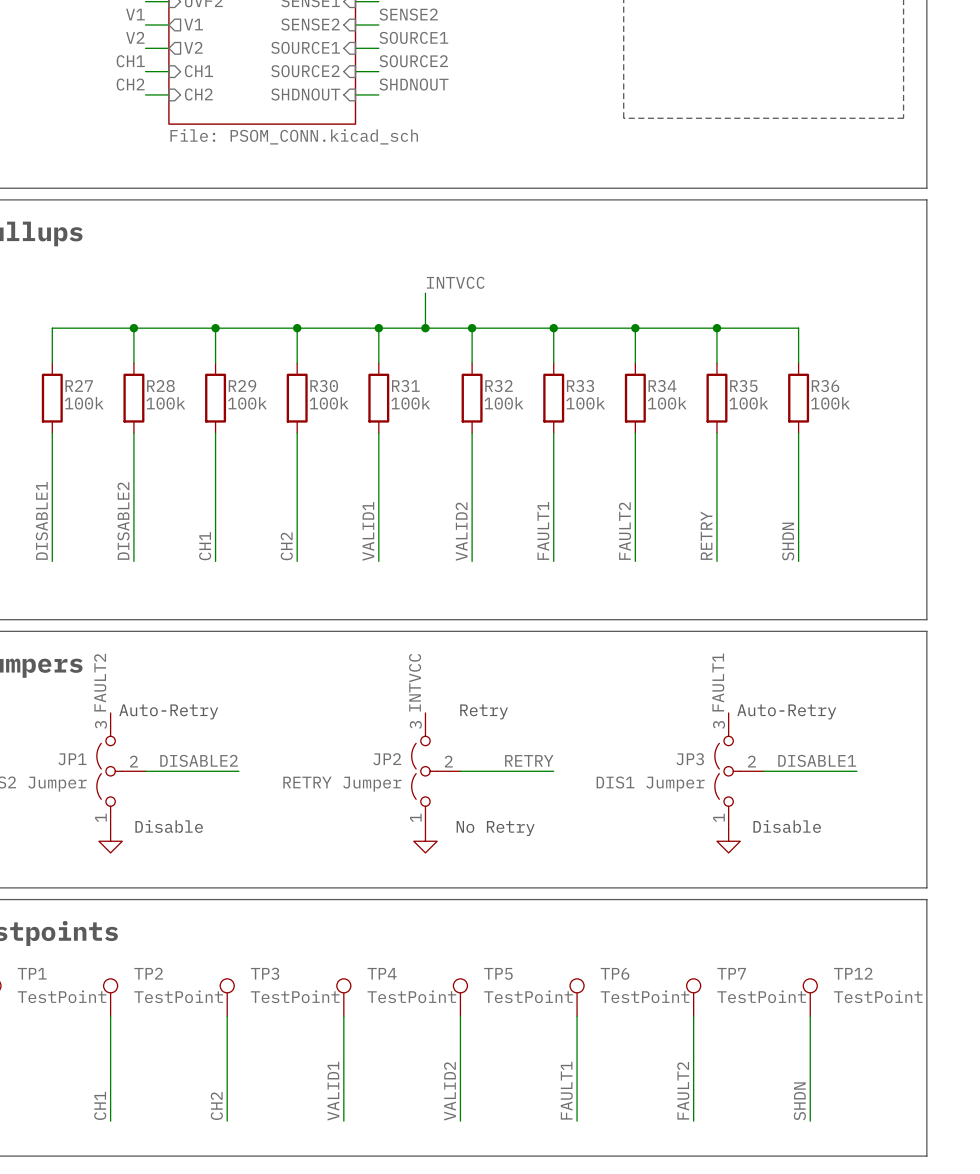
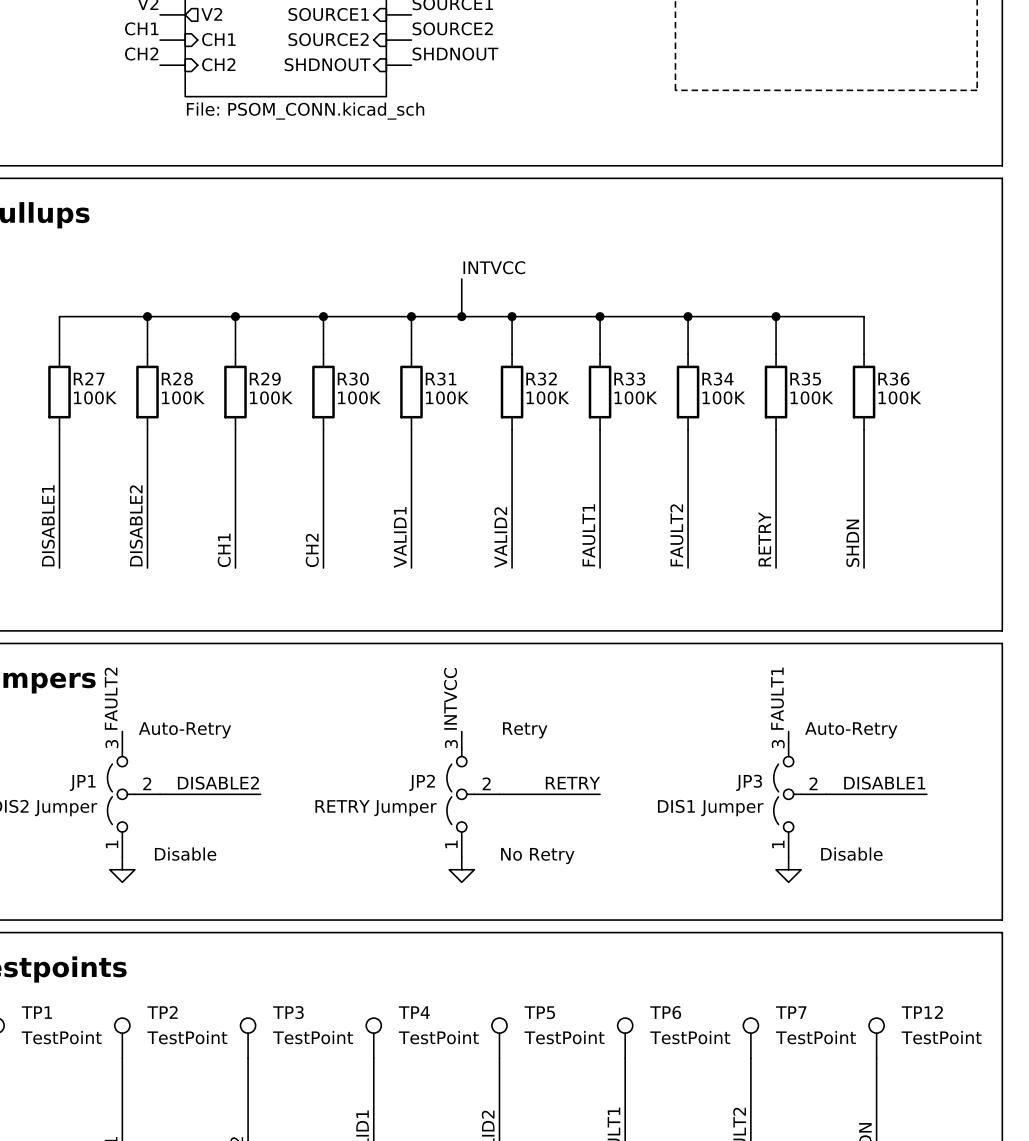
R27 value: 100k (84, 403) -> 100K (95, 397)
R28 value: 100k (165, 403) -> 100K (183, 397)
R29 value: 100k (247, 403) -> 100K (271, 397)
R30 value: 100k (329, 403) -> 100K (359, 397)
R31 value: 100k (410, 403) -> 100K (447, 397)
R32 value: 100k (504, 403) -> 100K (547, 397)
R33 value: 100k (585, 403) -> 100K (635, 397)
R34 value: 100k (667, 403) -> 100K (723, 397)
R35 value: 100k (748, 403) -> 100K (811, 397)
R36 value: 100k (830, 403) -> 100K (899, 397)

